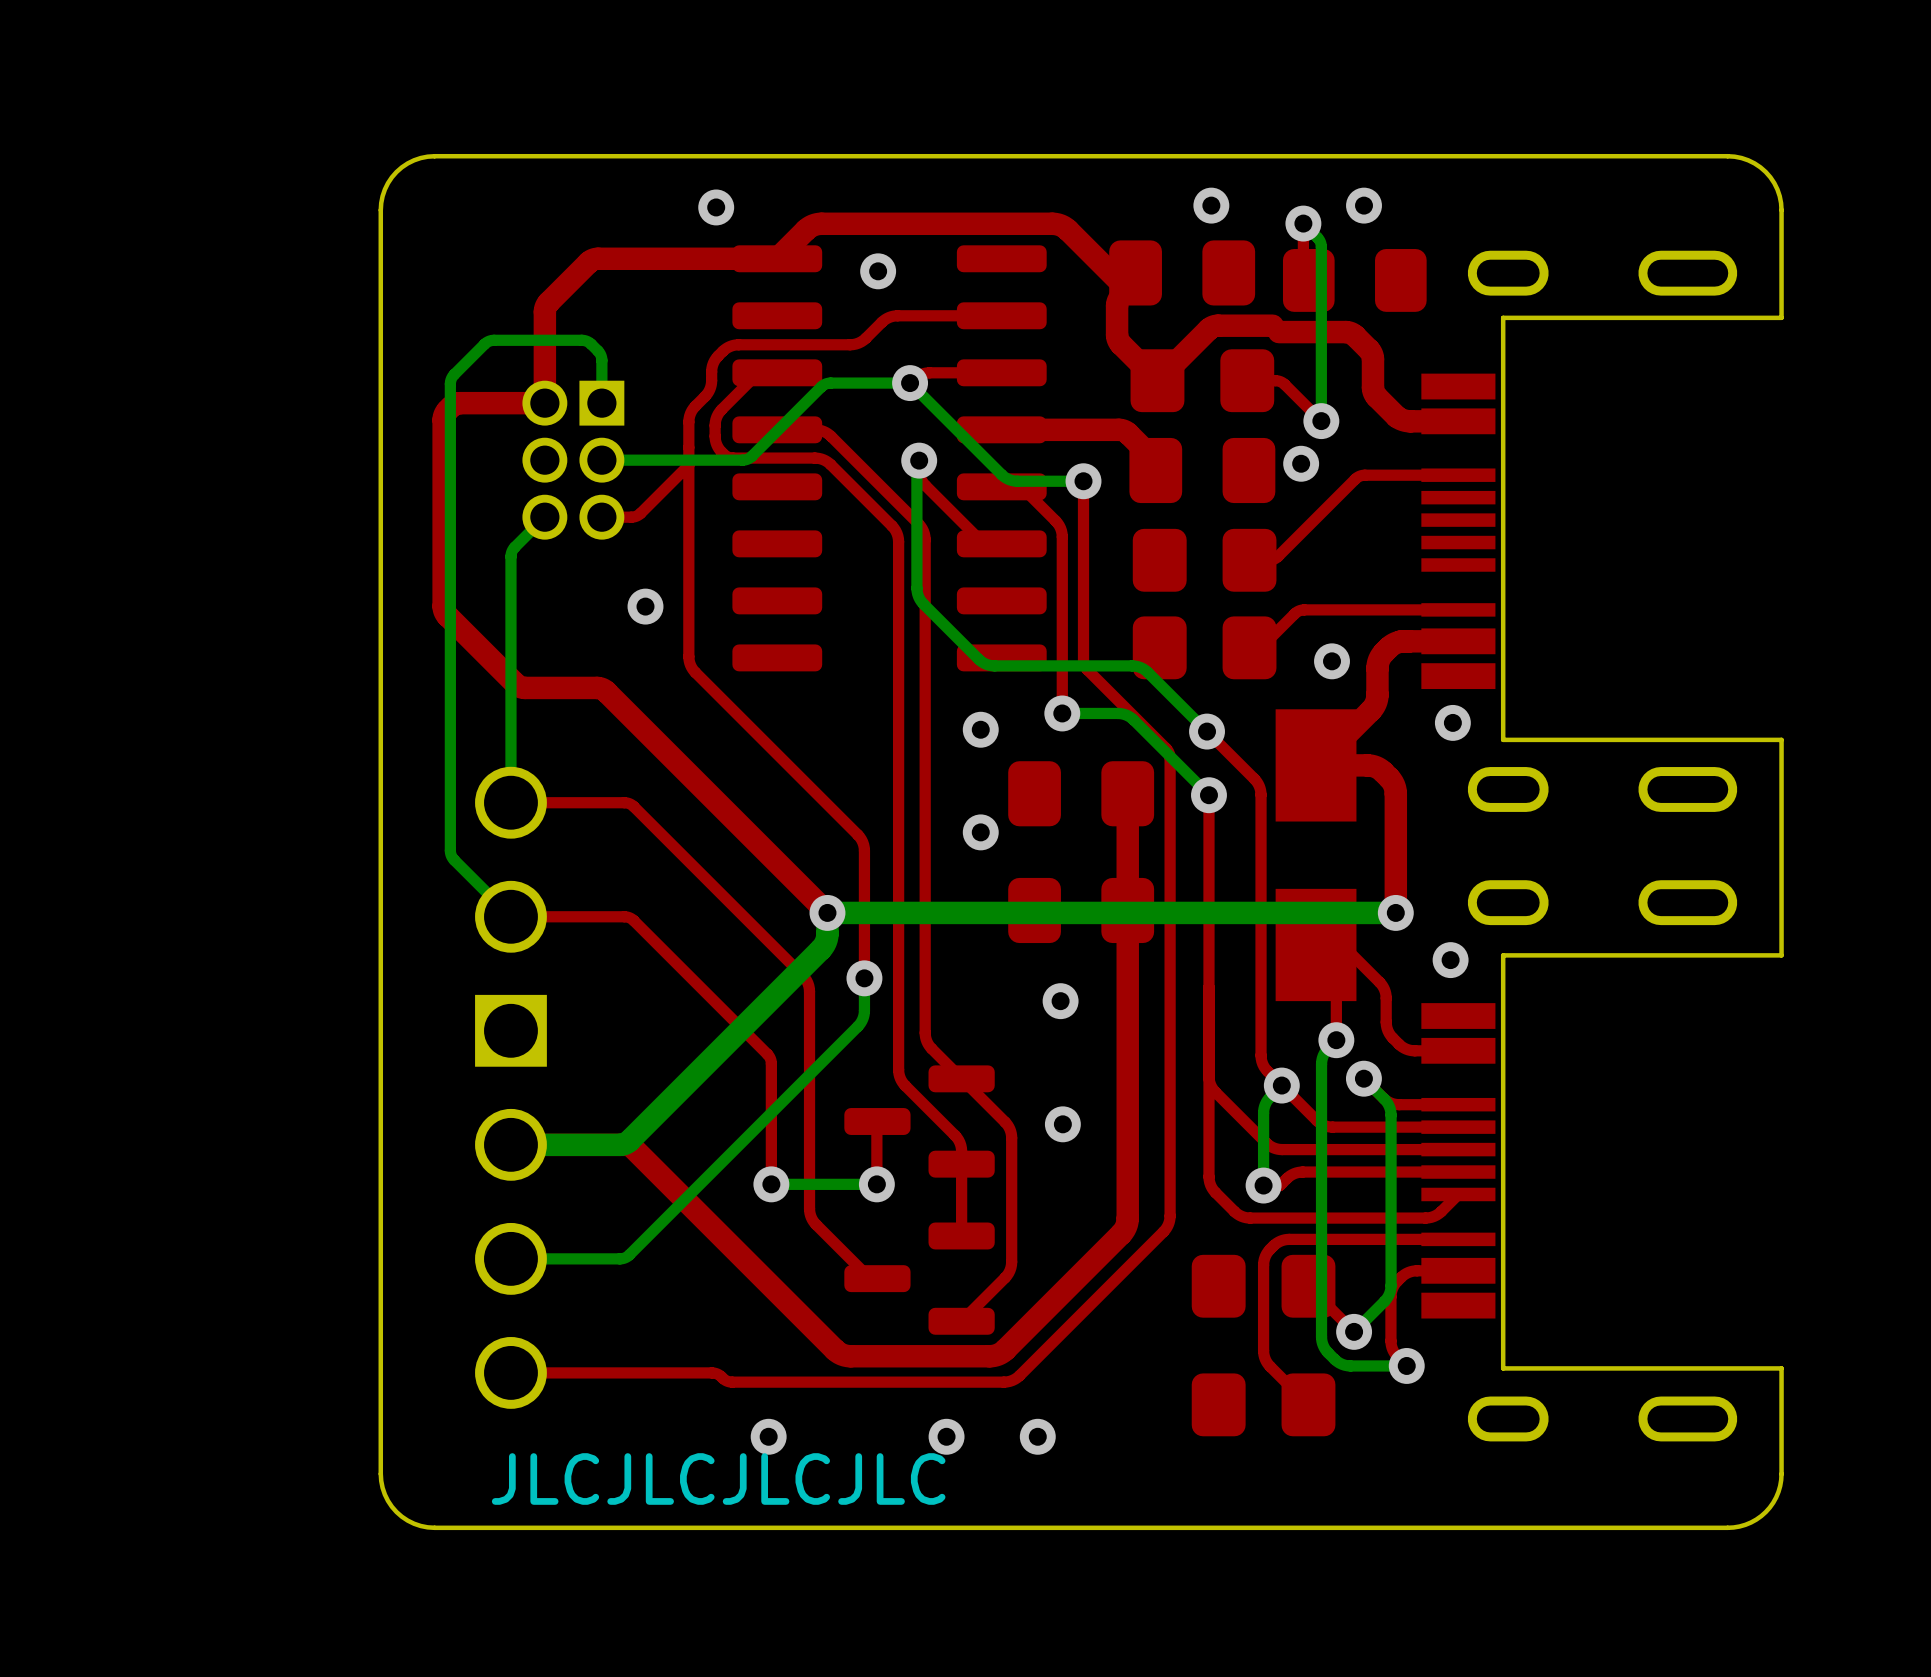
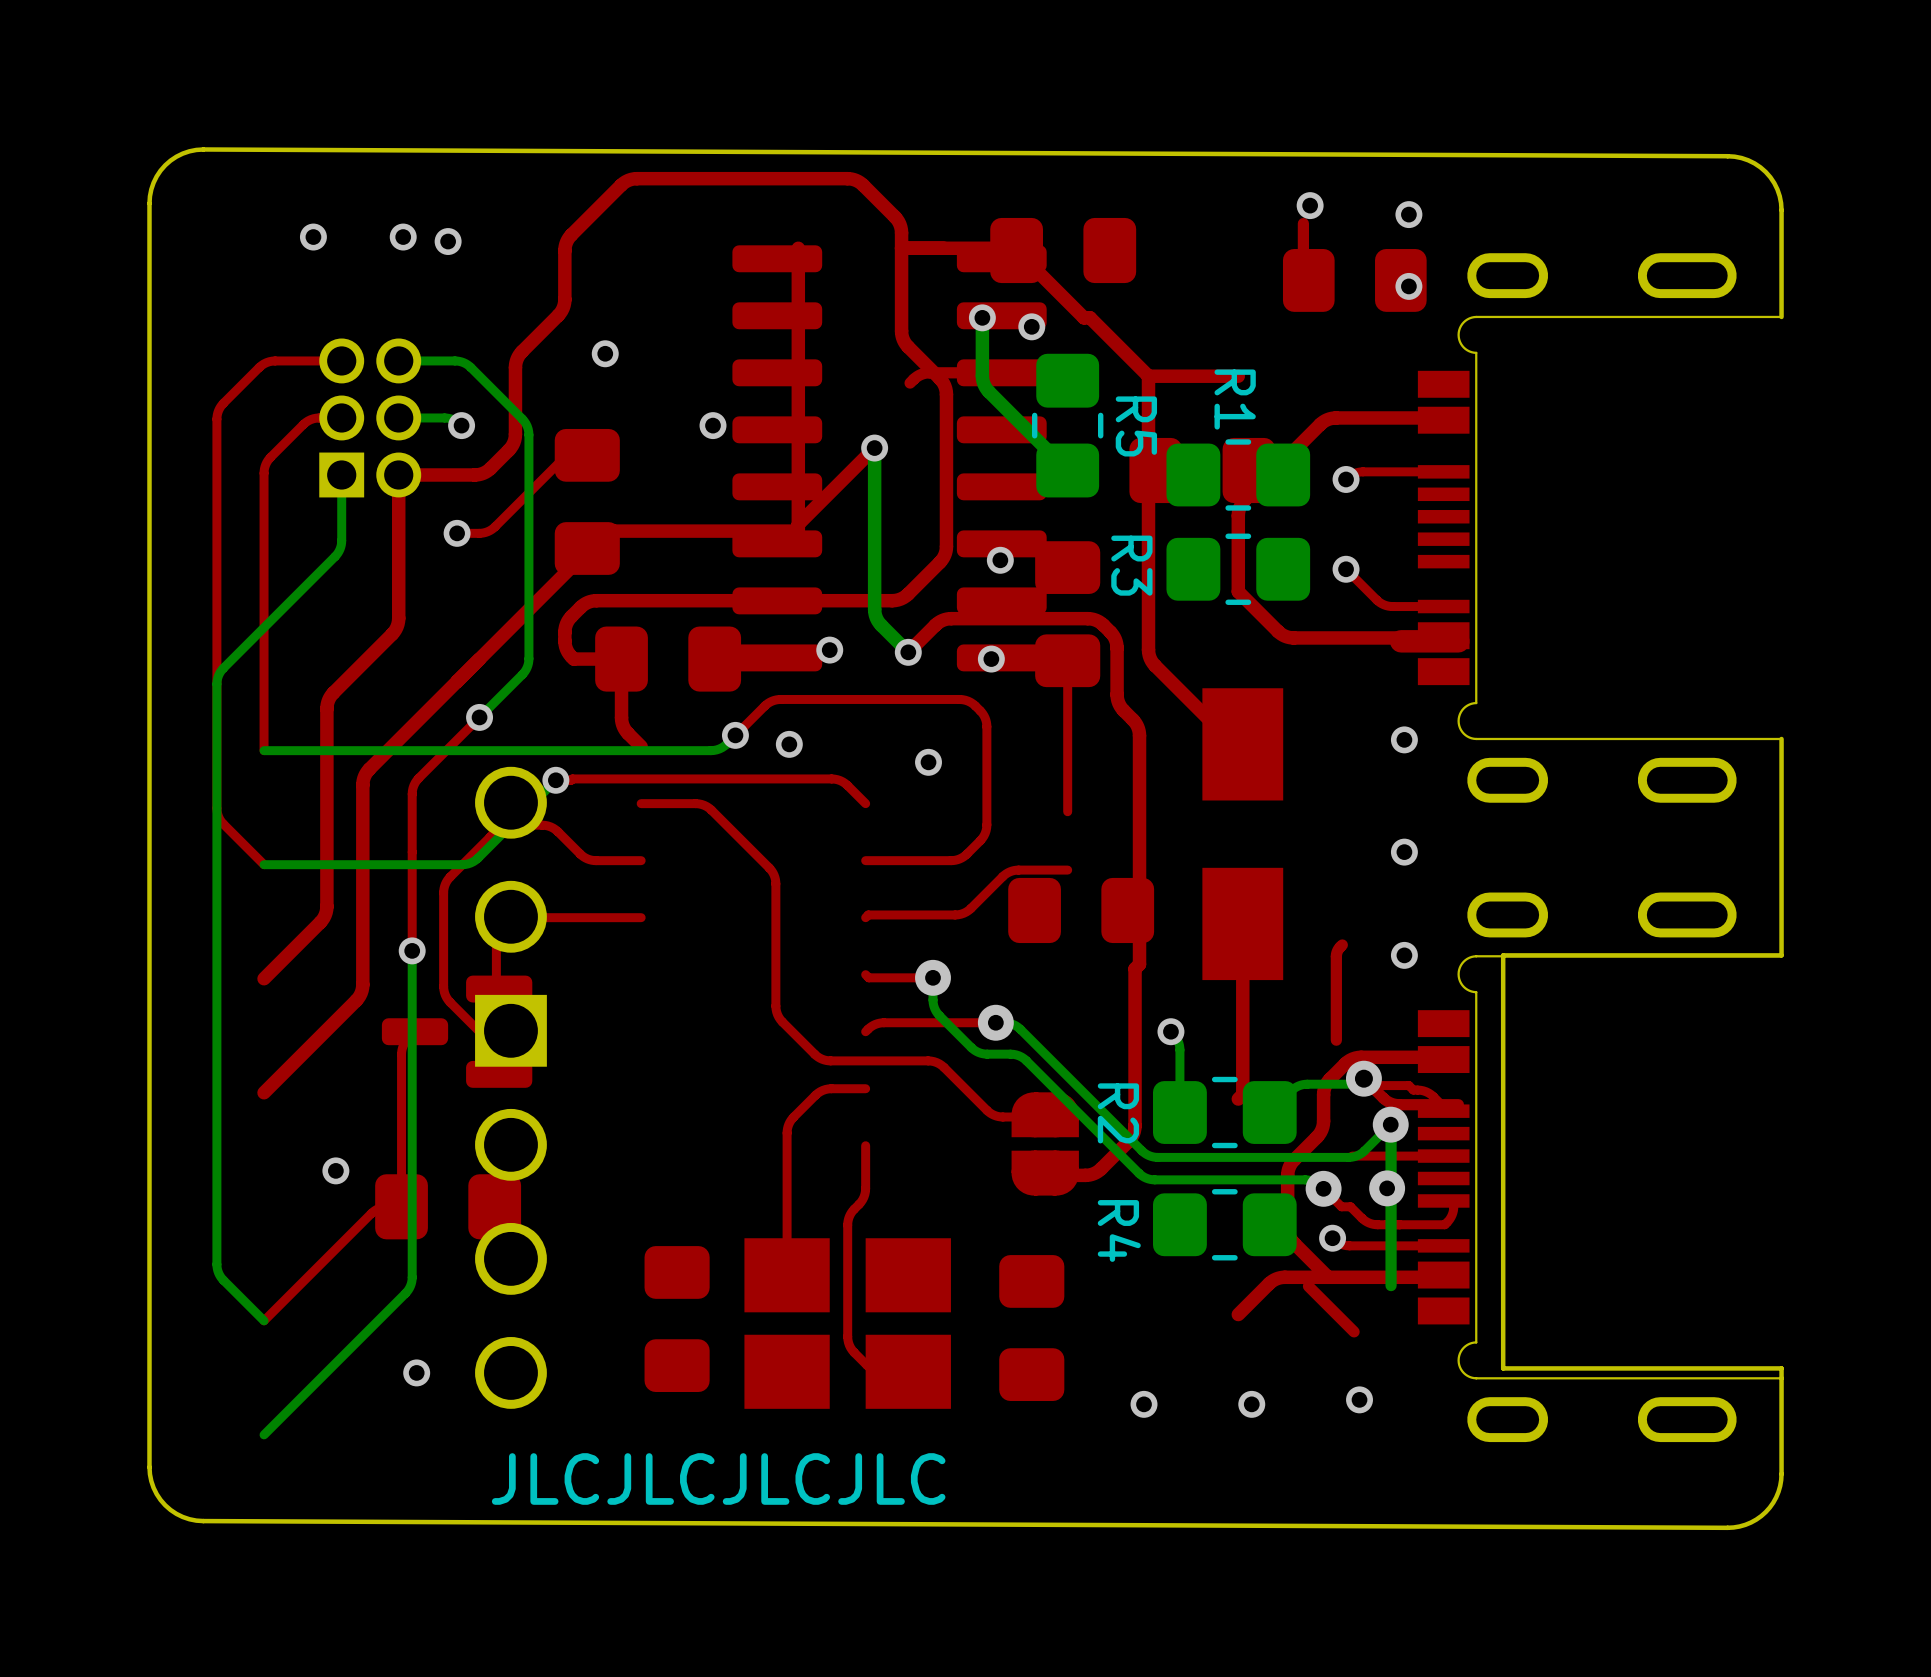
board edge: (1727, 156) (434, 156) (414, 160) (396, 172) (384, 189) (380, 210) (380, 1473) (384, 1494) (396, 1512) (414, 1523) (434, 1527) (1727, 1527) -> (1727, 156) (203, 149) (182, 153) (165, 165) (153, 182) (149, 203) (149, 1467) (151, 1481) (156, 1494) (170, 1509) (182, 1516) (203, 1521) (1727, 1527)
via: (1211, 205) -> none
via: (1364, 205) -> none
via: (716, 207) -> none
via: none -> (1408, 214)
bottom track: (1303, 223) (1318, 238) (1321, 245) (1321, 421) -> none
via position: (1303, 223) -> (1310, 205)
via: none -> (313, 237)
via: none -> (403, 237)
via: none -> (448, 241)
top track: none -> (798, 248) (798, 531) (613, 531) (603, 533) (369, 769) (364, 776) (362, 785) (362, 990) (356, 1000) (264, 1092)
top track: none -> (901, 248) (1014, 248) (1083, 317) (1090, 317) (1148, 376)
part footprint: [1421, 250, 1738, 812] -> [1417, 253, 1783, 803]
via: (878, 271) -> none
part position: (1182, 272) -> (1063, 250)
top track: (1135, 281) (1117, 302) (1117, 337) (1121, 344) (1157, 380) (1211, 327) (1272, 325) -> none
top track: (1120, 282) (1066, 228) (1052, 223) (819, 223) (807, 228) (777, 258) (595, 259) (588, 262) (545, 308) (544, 403) (459, 403) (451, 406) (444, 414) (443, 606) (446, 614) (518, 686) (598, 688) (605, 691) (827, 912) -> none
via: none -> (1408, 286)
top track: (1001, 315) (893, 316) (883, 320) (863, 340) (853, 344) (732, 345) (724, 349) (714, 360) (709, 389) (693, 408) (689, 416) (689, 663) (695, 672) (861, 839) (864, 850) (864, 978) -> none
board edge: (1781, 316) (1503, 317) (1503, 739) (1781, 739) -> none
bottom track: none -> (982, 317) (982, 375) (985, 387) (1067, 470)
via: none -> (982, 317)
via: none -> (1031, 326)
top track: (1279, 332) (1352, 333) (1371, 354) (1374, 393) (1396, 416) (1407, 421) (1458, 421) -> none
via: none -> (605, 353)
top track: none -> (341, 360) (275, 360) (266, 362) (223, 403) (217, 414) (217, 811) (223, 824) (264, 864)
bottom track: none -> (398, 360) (454, 360) (465, 363) (522, 419) (528, 429) (528, 663) (523, 672) (479, 717)
top track: (777, 372) (763, 373) (755, 376) (719, 411) (715, 425) (715, 440) (718, 448) (725, 455) (731, 458) (814, 458) (825, 460) (892, 525) (897, 536) (898, 1071) (903, 1083) (959, 1142) (961, 1151) (961, 1235) -> none
top track: none -> (1148, 376) (1149, 655) (1155, 665) (1233, 744) (1242, 744)
top track: none -> (1238, 376) (1148, 376)
part footprint: [522, 380, 625, 540] -> [554, 428, 620, 575]
R5 side: top (1202, 380) -> bottom (1067, 425)
top track: (1247, 380) (1281, 382) (1321, 421) -> none
via: (910, 383) -> none
bottom track: (601, 403) (601, 356) (590, 343) (583, 340) (490, 340) (454, 374) (450, 381) (450, 851) (454, 860) (510, 916) -> none
top track: none -> (341, 417) (316, 418) (308, 420) (270, 457) (264, 468) (264, 750)
part: none -> (370, 417)
bottom track: none -> (398, 417) (446, 418) (455, 420) (461, 425)
top track: none -> (1449, 417) (1336, 417) (1327, 419) (1320, 424) (1244, 499) (1240, 507) (1238, 515) (1238, 591) (1283, 635) (1293, 637) (1449, 637)
via: (1321, 421) -> none
via: none -> (461, 425)
via: none -> (713, 425)
top track: (777, 429) (817, 429) (827, 433) (918, 523) (924, 534) (925, 1035) (931, 1048) (1006, 1123) (1011, 1137) (1010, 1267) (1005, 1277) (961, 1321) -> none
top track: (1001, 429) (1122, 430) (1152, 458) (1155, 470) -> none
top track: none -> (874, 448) (798, 524)
bottom track: none -> (874, 448) (874, 612) (879, 623) (908, 652)
via: none -> (874, 448)
top track: none -> (587, 455) (572, 455) (562, 459) (489, 530) (481, 533) (457, 533)
bottom track: (601, 460) (745, 459) (751, 456) (825, 384) (910, 383) (1006, 478) (1017, 481) (1083, 481) -> none
top track: (919, 460) (920, 476) (925, 485) (979, 539) (987, 543) (1001, 543) -> none
bottom track: (919, 460) (916, 462) (917, 593) (923, 604) (978, 659) (986, 664) (994, 665) (1137, 666) (1147, 672) (1207, 731) -> none
via: (919, 460) -> none
via: (1301, 463) -> none
top track: (688, 465) (637, 515) (601, 517) -> none
top track: none -> (1449, 471) (1360, 471) (1352, 474) (1346, 479)
bottom track: none -> (341, 474) (341, 540) (337, 553) (223, 668) (217, 681) (217, 1266) (221, 1278) (264, 1320)
top track: (1458, 475) (1359, 476) (1277, 557) (1269, 560) (1249, 560) -> none
via: none -> (1346, 479)
top track: (1083, 481) (1084, 664) (1087, 669) (1166, 748) (1170, 756) (1170, 1215) (1166, 1228) (1019, 1375) (1009, 1381) (732, 1382) (711, 1372) (510, 1372) -> none
via: (1083, 481) -> none
top track: (1001, 486) (1016, 487) (1024, 490) (1055, 521) (1061, 531) (1062, 713) -> none
bottom track: (544, 517) (514, 548) (511, 555) (510, 802) -> none
via: none -> (457, 533)
via: none -> (1000, 560)
R1 side: top (1204, 560) -> bottom (1238, 474)
top track: none -> (1346, 569) (1384, 604) (1449, 606)
via: none -> (1346, 569)
via: (645, 606) -> none
top track: (1458, 609) (1301, 610) (1294, 613) (1262, 645) (1249, 647) -> none
part: none -> (1067, 614)
top track: (1404, 641) (1392, 645) (1379, 659) (1377, 696) (1373, 707) (1316, 765) (1371, 765) (1381, 770) (1392, 782) (1395, 793) (1395, 912) -> none
R3 side: top (1204, 647) -> bottom (1238, 569)
via: none -> (829, 650)
top track: none -> (908, 652) (937, 623) (949, 618) (1090, 618) (1103, 625) (1116, 641) (1117, 700) (1121, 708) (1135, 723) (1139, 735) (1139, 964) (1135, 968) (1134, 1128) (1130, 1139) (1099, 1170) (1089, 1174) (1072, 1175)
via: none -> (908, 652)
part: none -> (668, 659)
via: none -> (991, 659)
top track: none -> (1067, 660) (1067, 811)
via: (1332, 661) -> none
bottom track: (1062, 713) (1117, 713) (1129, 716) (1208, 795) -> none
via: (1062, 713) -> none
top track: none -> (479, 717) (418, 778) (412, 788) (412, 950)
via: none -> (479, 717)
via: (1452, 722) -> none
via: (980, 729) -> none
top track: (1207, 731) (1254, 779) (1260, 790) (1261, 1055) (1264, 1066) (1316, 1120) (1326, 1126) (1458, 1127) -> none
via: (1207, 731) -> none
top track: none -> (735, 735) (766, 704) (778, 699) (959, 699) (968, 701) (975, 706) (983, 714) (986, 724) (986, 824) (982, 838) (965, 855) (955, 860) (865, 860)
bottom track: none -> (735, 735) (722, 747) (710, 750) (264, 750)
via: none -> (735, 735)
via: none -> (1404, 739)
via: none -> (789, 744)
top track: none -> (641, 746) (626, 731) (621, 722) (621, 659) (573, 659) (566, 649) (564, 632) (566, 623) (584, 604) (596, 600) (895, 600) (908, 594) (944, 555) (946, 546) (945, 388) (941, 380) (908, 346) (902, 337) (901, 232) (899, 224) (895, 216) (855, 180) (847, 178) (631, 179) (621, 185) (568, 238) (564, 248) (563, 308) (520, 353) (516, 361) (515, 434) (510, 447) (488, 469) (479, 474) (398, 474) (397, 624) (392, 634) (331, 694) (327, 704) (326, 912) (320, 922) (264, 978)
via: none -> (928, 762)
top track: none -> (555, 780) (834, 779) (845, 783) (865, 803)
bottom track: none -> (555, 780) (478, 858) (467, 863) (264, 864)
via: none -> (555, 780)
part: (1081, 793) -> none
top track: (1127, 793) (1126, 1223) (1121, 1234) (1000, 1353) (989, 1356) (850, 1356) (842, 1354) (834, 1349) (627, 1142) (625, 1144) (510, 1144) -> none
top track: (1208, 795) (1208, 1176) (1211, 1187) (1236, 1212) (1250, 1218) (1428, 1217) (1439, 1213) (1458, 1194) -> none
via: (1208, 795) -> none
top track: (510, 802) (624, 802) (630, 804) (804, 977) (809, 991) (809, 1213) (816, 1224) (866, 1274) (877, 1278) -> none
top track: none -> (641, 803) (695, 803) (706, 806) (772, 871) (775, 883) (776, 1011) (782, 1021) (818, 1057) (830, 1060) (934, 1061) (944, 1067) (994, 1115) (1002, 1117) (1072, 1117)
via: (980, 832) -> none
via: none -> (1404, 852)
part position: (1316, 855) -> (1242, 834)
top track: none -> (641, 860) (589, 859) (581, 855) (553, 828) (545, 825) (514, 824) (507, 820) (496, 809) (496, 824) (491, 835) (447, 880) (443, 892) (444, 992) (450, 1002) (495, 1048) (499, 1058) (499, 1074)
top track: none -> (1067, 870) (1010, 871) (968, 910) (960, 914) (868, 914) (865, 917)
part footprint: [1421, 880, 1738, 1442] -> [1417, 892, 1783, 1443]
via: (827, 912) -> none
bottom track: (1395, 912) (827, 912) (827, 936) (822, 947) (627, 1142) (619, 1144) (510, 1144) -> none
via: (1395, 912) -> none
top track: (510, 916) (624, 916) (630, 918) (767, 1054) (771, 1063) (771, 1184) -> none
top track: none -> (641, 917) (524, 917) (514, 912) (496, 894) (496, 986) (499, 989)
top track: none -> (1242, 923) (1242, 1094) (1238, 1099)
top track: (1316, 944) (1342, 944) (1381, 983) (1386, 995) (1386, 1027) (1390, 1035) (1400, 1045) (1412, 1050) (1458, 1050) -> none
bottom track: none -> (412, 950) (411, 1283) (405, 1293) (264, 1434)
via: none -> (412, 950)
via: none -> (1404, 955)
via: (1450, 960) -> none
top track: none -> (865, 974) (868, 977) (933, 977)
bottom track: none -> (933, 977) (933, 1002) (936, 1011) (971, 1047) (982, 1053) (1013, 1054) (1024, 1058) (1144, 1177) (1154, 1179) (1305, 1179) (1313, 1181) (1323, 1188)
via: none -> (933, 977)
bottom track: (864, 978) (864, 1012) (859, 1024) (628, 1255) (619, 1258) (510, 1258) -> none
via: (864, 978) -> none
via: (1060, 1001) -> none
top track: none -> (995, 1022) (881, 1022) (873, 1025) (865, 1031)
bottom track: none -> (995, 1022) (1010, 1023) (1018, 1027) (1141, 1150) (1151, 1156) (1351, 1157) (1362, 1152) (1390, 1124)
via: none -> (995, 1022)
top track: none -> (415, 1031) (405, 1042) (401, 1052) (401, 1206) (383, 1207) (373, 1211) (264, 1320)
part: none -> (457, 1031)
bottom track: none -> (1170, 1031) (1177, 1039) (1179, 1047) (1179, 1112)
via: none -> (1170, 1031)
bottom track: (1336, 1040) (1324, 1053) (1321, 1064) (1321, 1341) (1328, 1352) (1336, 1361) (1344, 1365) (1406, 1365) -> none
via: (1336, 1040) -> none
top track: none -> (1449, 1057) (1355, 1058) (1345, 1063) (1326, 1084) (1323, 1092) (1321, 1129) (1292, 1161) (1288, 1169) (1287, 1227) (1292, 1241) (1328, 1277)
top track: (1208, 1076) (1210, 1084) (1215, 1092) (1266, 1143) (1275, 1148) (1458, 1149) -> none
bottom track: (1363, 1078) (1386, 1101) (1391, 1115) -> none
bottom track: none -> (1364, 1084) (1300, 1085) (1293, 1089) (1269, 1112)
bottom track: (1281, 1085) (1268, 1098) (1264, 1108) (1263, 1185) -> none
via: (1281, 1085) -> none
top track: none -> (1365, 1085) (1408, 1085) (1413, 1090) (1423, 1090) (1431, 1094) (1443, 1106) (1443, 1111)
top track: none -> (865, 1088) (822, 1090) (815, 1095) (788, 1124) (787, 1133) (787, 1275)
part: (919, 1121) -> none
top track: (876, 1122) (876, 1184) -> none
via: (1062, 1124) -> none
via: none -> (1390, 1124)
part: none -> (1045, 1143)
top track: none -> (865, 1145) (864, 1194) (850, 1214) (847, 1222) (847, 1339) (852, 1350) (872, 1369) (880, 1371) (908, 1371)
top track: none -> (1449, 1156) (1352, 1156)
via: none -> (335, 1170)
top track: (1458, 1172) (1300, 1172) (1290, 1175) (1279, 1185) (1263, 1185) -> none
via: (771, 1184) -> none
bottom track: (876, 1184) (771, 1184) -> none
via: (876, 1184) -> none
top track: none -> (1328, 1184) (1323, 1188) (1341, 1206) (1350, 1206) (1365, 1220) (1375, 1224) (1444, 1224) (1453, 1210) (1453, 1205) (1449, 1200)
via: (1263, 1185) -> none
via: none -> (1323, 1188)
via: none -> (1387, 1188)
part: none -> (448, 1206)
top track: none -> (1332, 1238) (1340, 1244) (1349, 1245) (1449, 1245)
via: none -> (1332, 1238)
top track: (1458, 1239) (1287, 1239) (1278, 1242) (1270, 1249) (1265, 1256) (1263, 1265) (1264, 1355) (1268, 1364) (1308, 1404) -> none
top track: (1458, 1270) (1412, 1271) (1402, 1275) (1393, 1285) (1390, 1296) (1391, 1345) (1396, 1355) (1406, 1365) -> none
top track: none -> (1449, 1277) (1280, 1277) (1270, 1282) (1238, 1314)
part: (919, 1278) -> none
bottom track: (1391, 1285) (1385, 1299) (1354, 1331) -> none
R2 side: top (1263, 1286) -> bottom (1224, 1112)
part: none -> (677, 1319)
part: none -> (847, 1323)
part: none -> (1031, 1328)
via: (1354, 1331) -> none
via: (1406, 1365) -> none
via: none -> (416, 1372)
via: none -> (1359, 1399)
via: none -> (1144, 1404)
via: none -> (1251, 1404)
R4 side: top (1263, 1404) -> bottom (1224, 1224)
via: (768, 1436) -> none
via: (946, 1436) -> none
via: (1037, 1436) -> none

